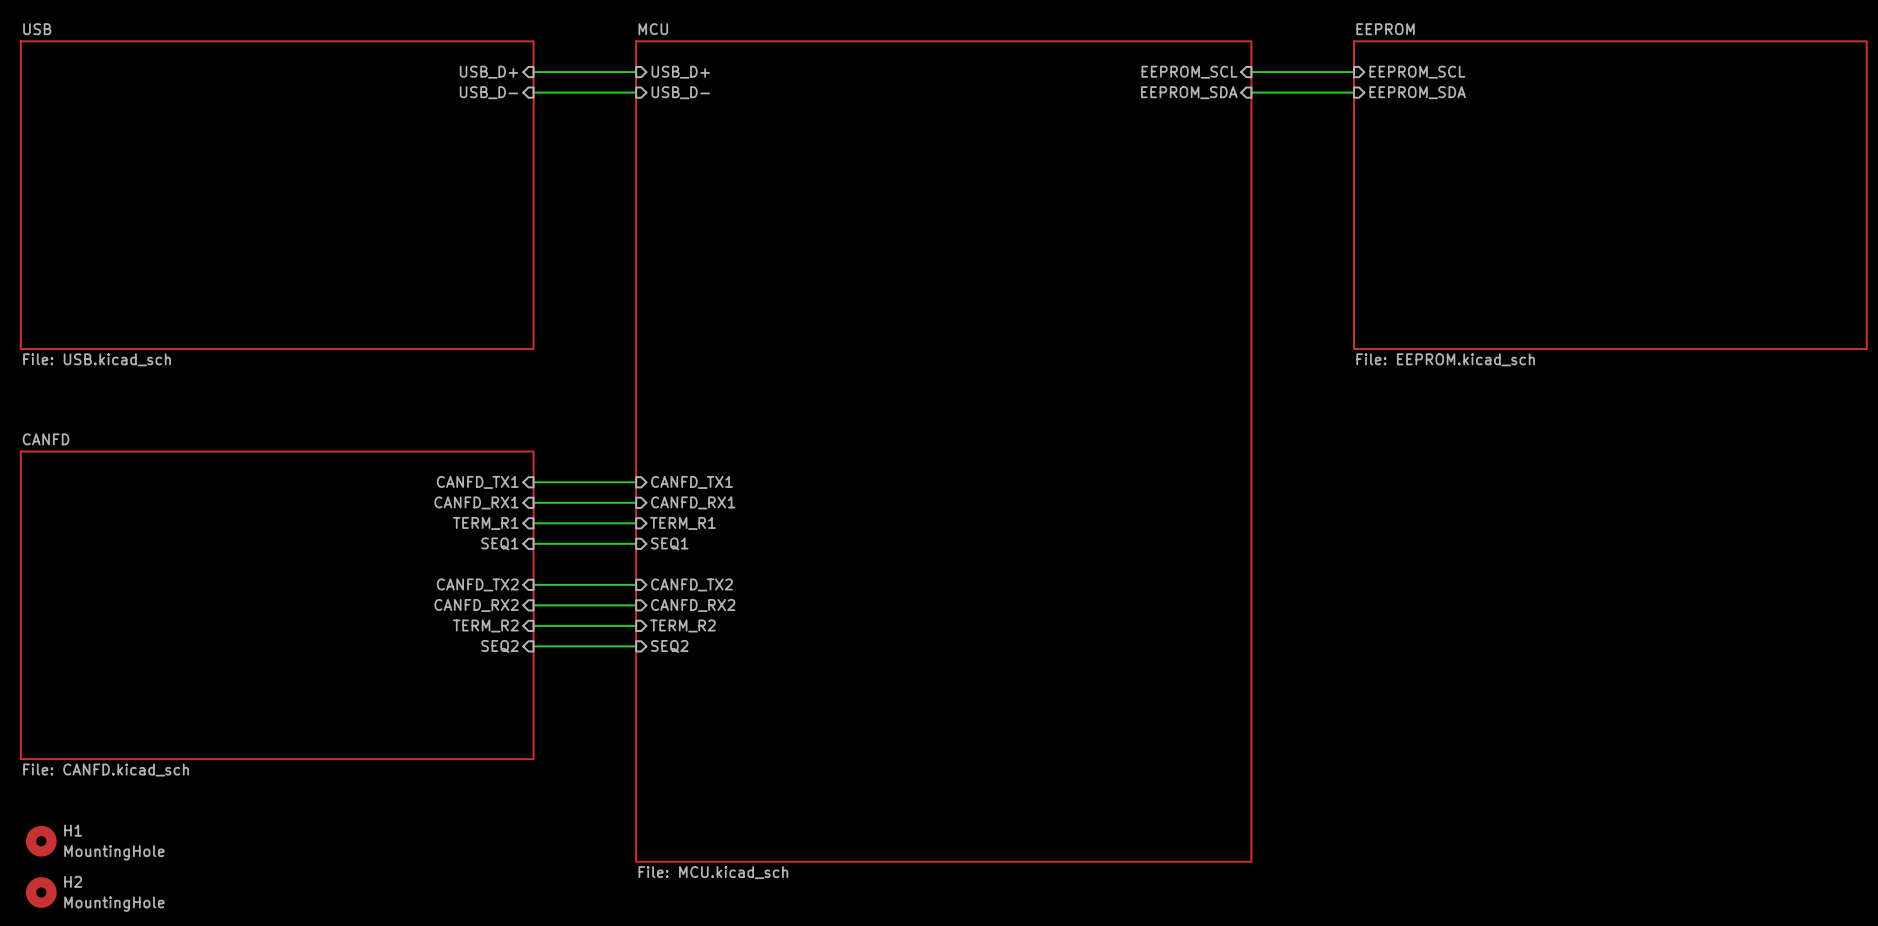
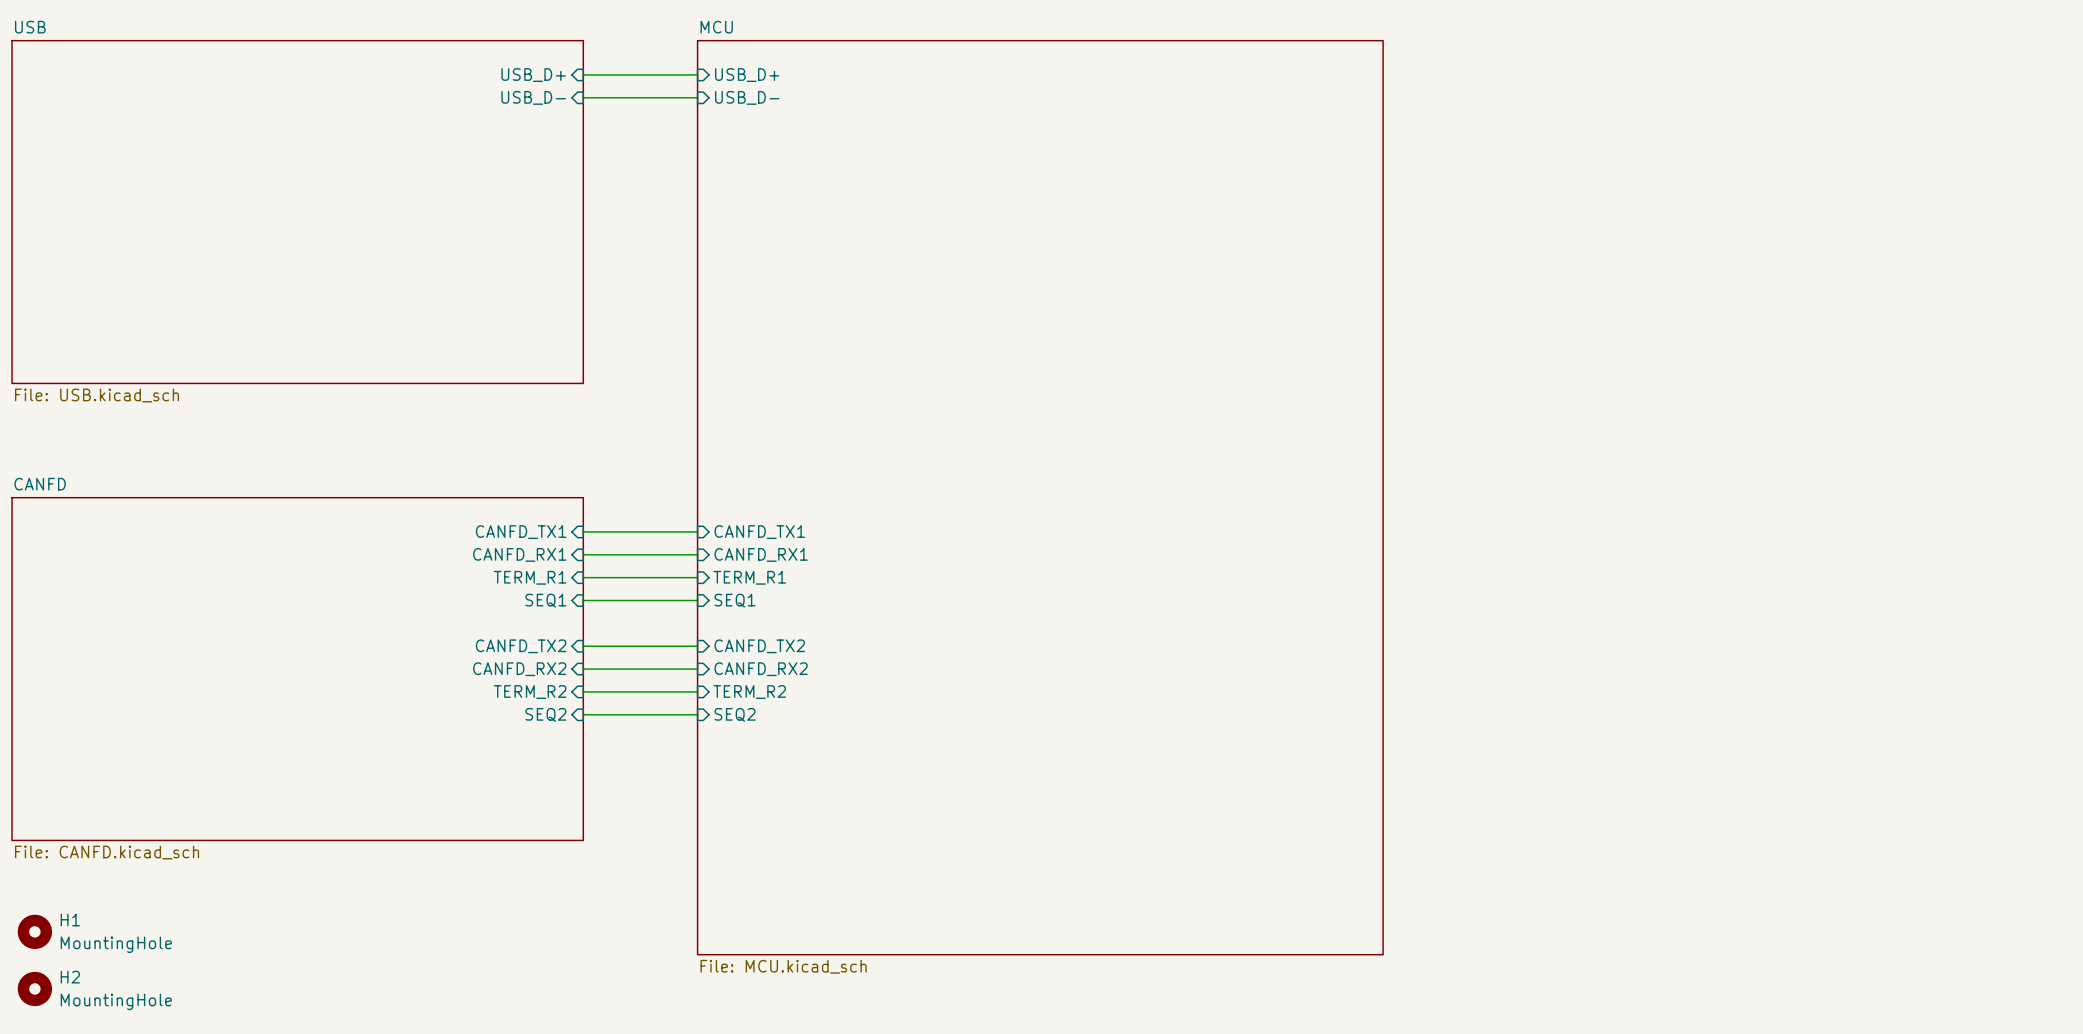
sheet pin: EEPROM_SCL (1189, 72) -> none
wire: (1251, 72) (1353, 72) -> none
sheet pin: EEPROM_SCL (1417, 72) -> none
sheet pin: EEPROM_SDA (1189, 92) -> none
wire: (1251, 92) (1353, 92) -> none
sheet pin: EEPROM_SDA (1417, 92) -> none
sheet EEPROM: File: EEPROM.kicad_sch (1610, 195) -> none

